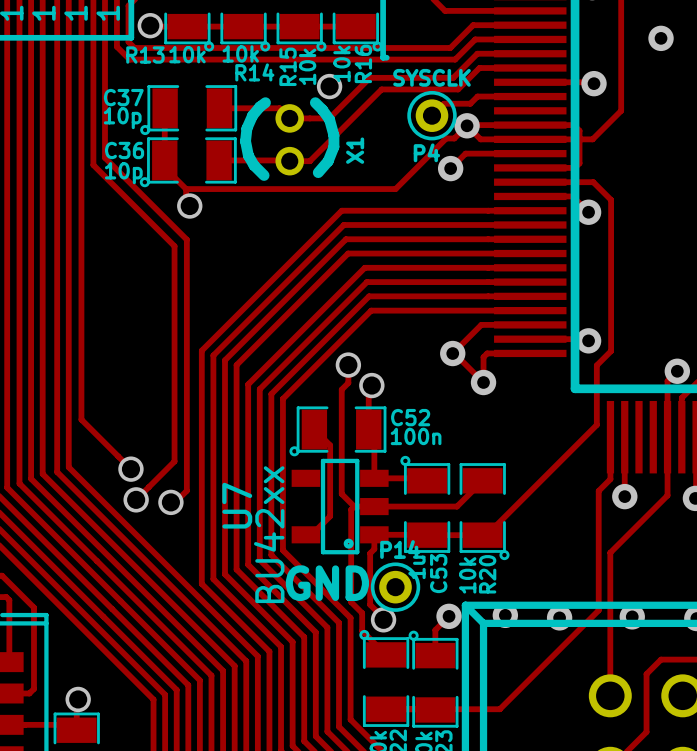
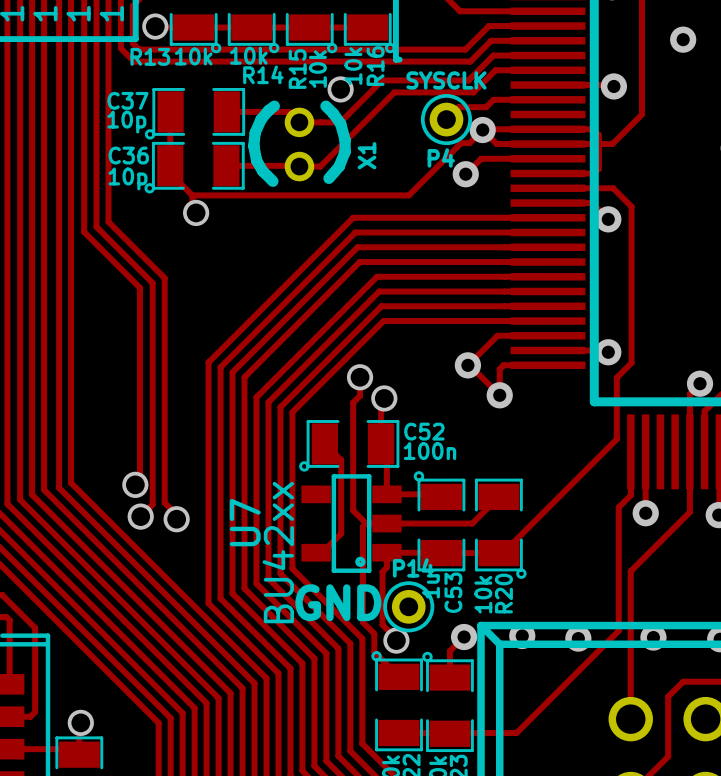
track: (104, 157) (186, 239) (186, 490) (175, 502) -> (108, 163) (108, 221) (164, 278) (164, 502) (181, 519)
track: (93, 165) (174, 246) (174, 461) (147, 488) -> (96, 170) (96, 226) (152, 283) (152, 504)
track: (81, 224) (81, 419) (130, 469) -> (84, 232) (139, 287) (139, 475) (130, 484)

